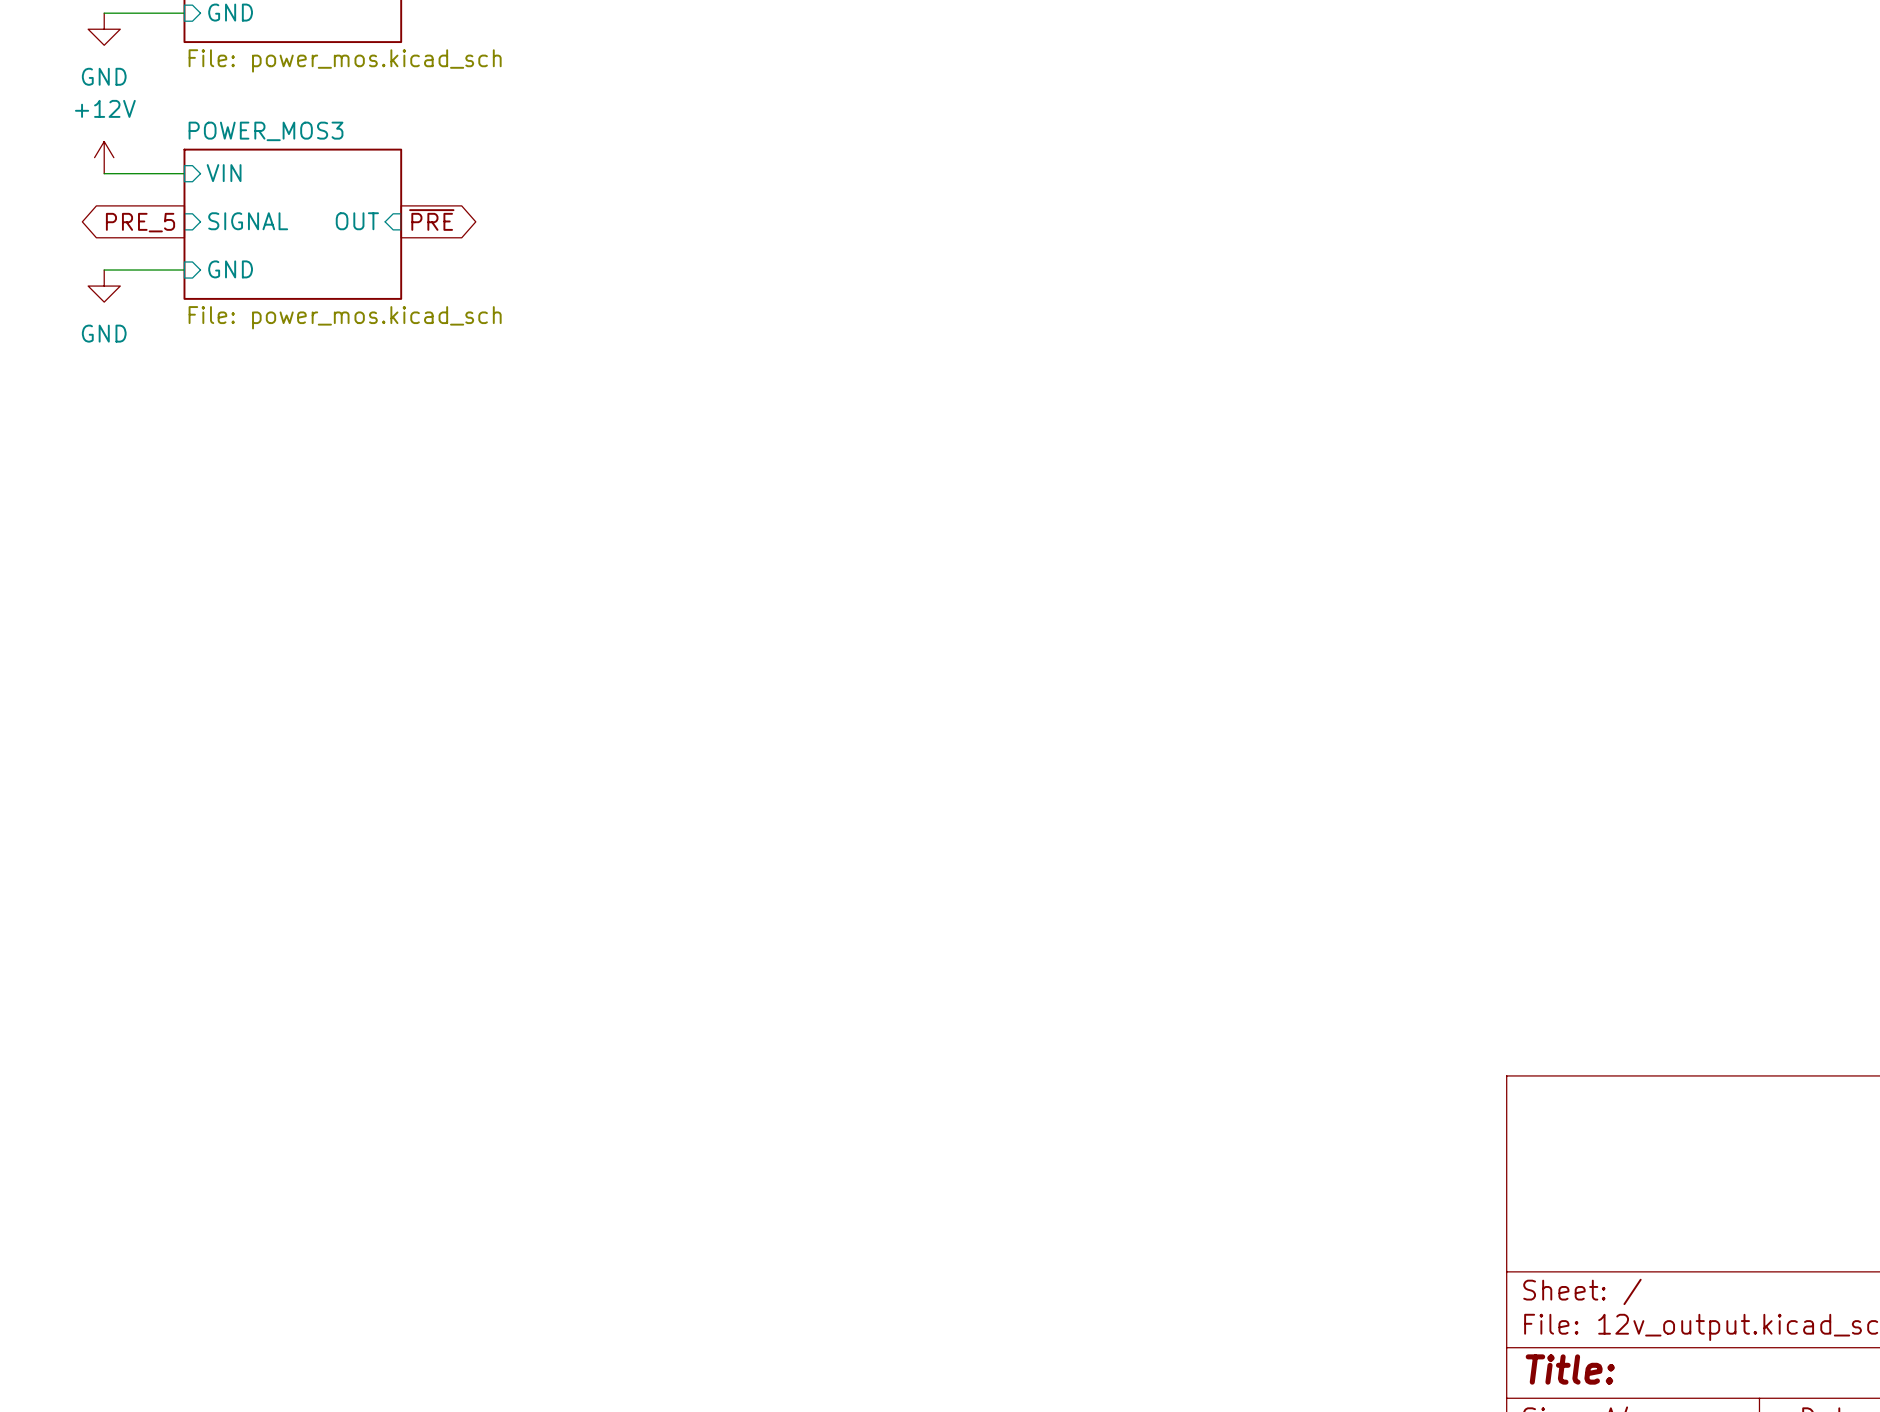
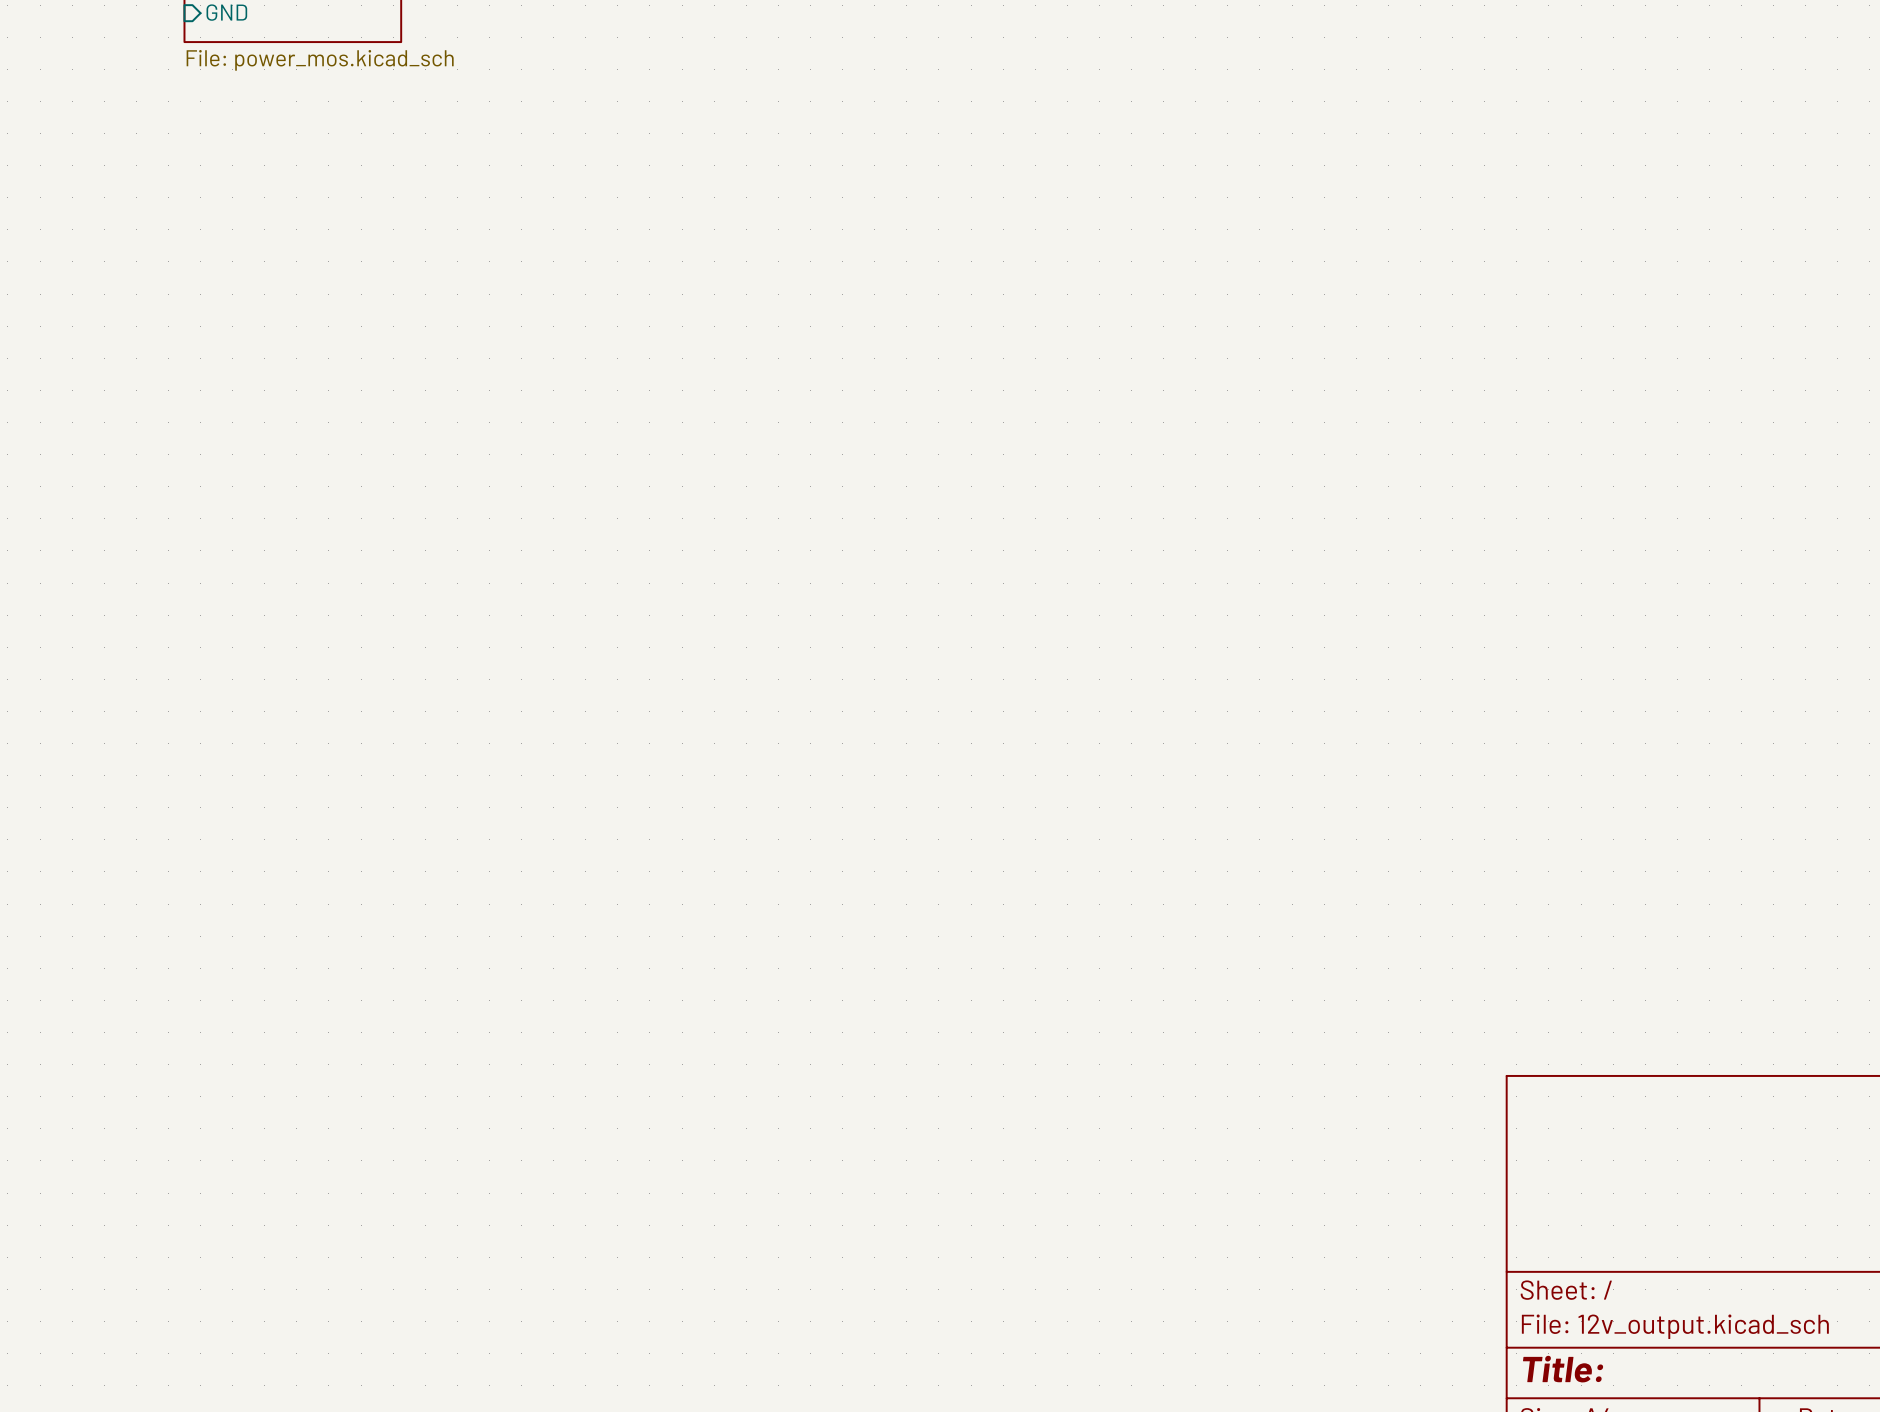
wire: (104, 13) (184, 13) -> none
power symbol: GND (104, 29) -> none
power symbol: +12V (104, 157) -> none
wire: (104, 173) (184, 173) -> none
sheet pin: VIN (224, 173) -> none
global label: ~{PRE} (431, 220) -> none
sheet pin: SIGNAL (248, 221) -> none
sheet pin: OUT (357, 221) -> none
global label: PRE_5 (140, 222) -> none
sheet POWER_MOS3: File: power_mos.kicad_sch (292, 224) -> none
sheet pin: GND (230, 269) -> none
wire: (104, 270) (184, 270) -> none
power symbol: GND (104, 286) -> none

